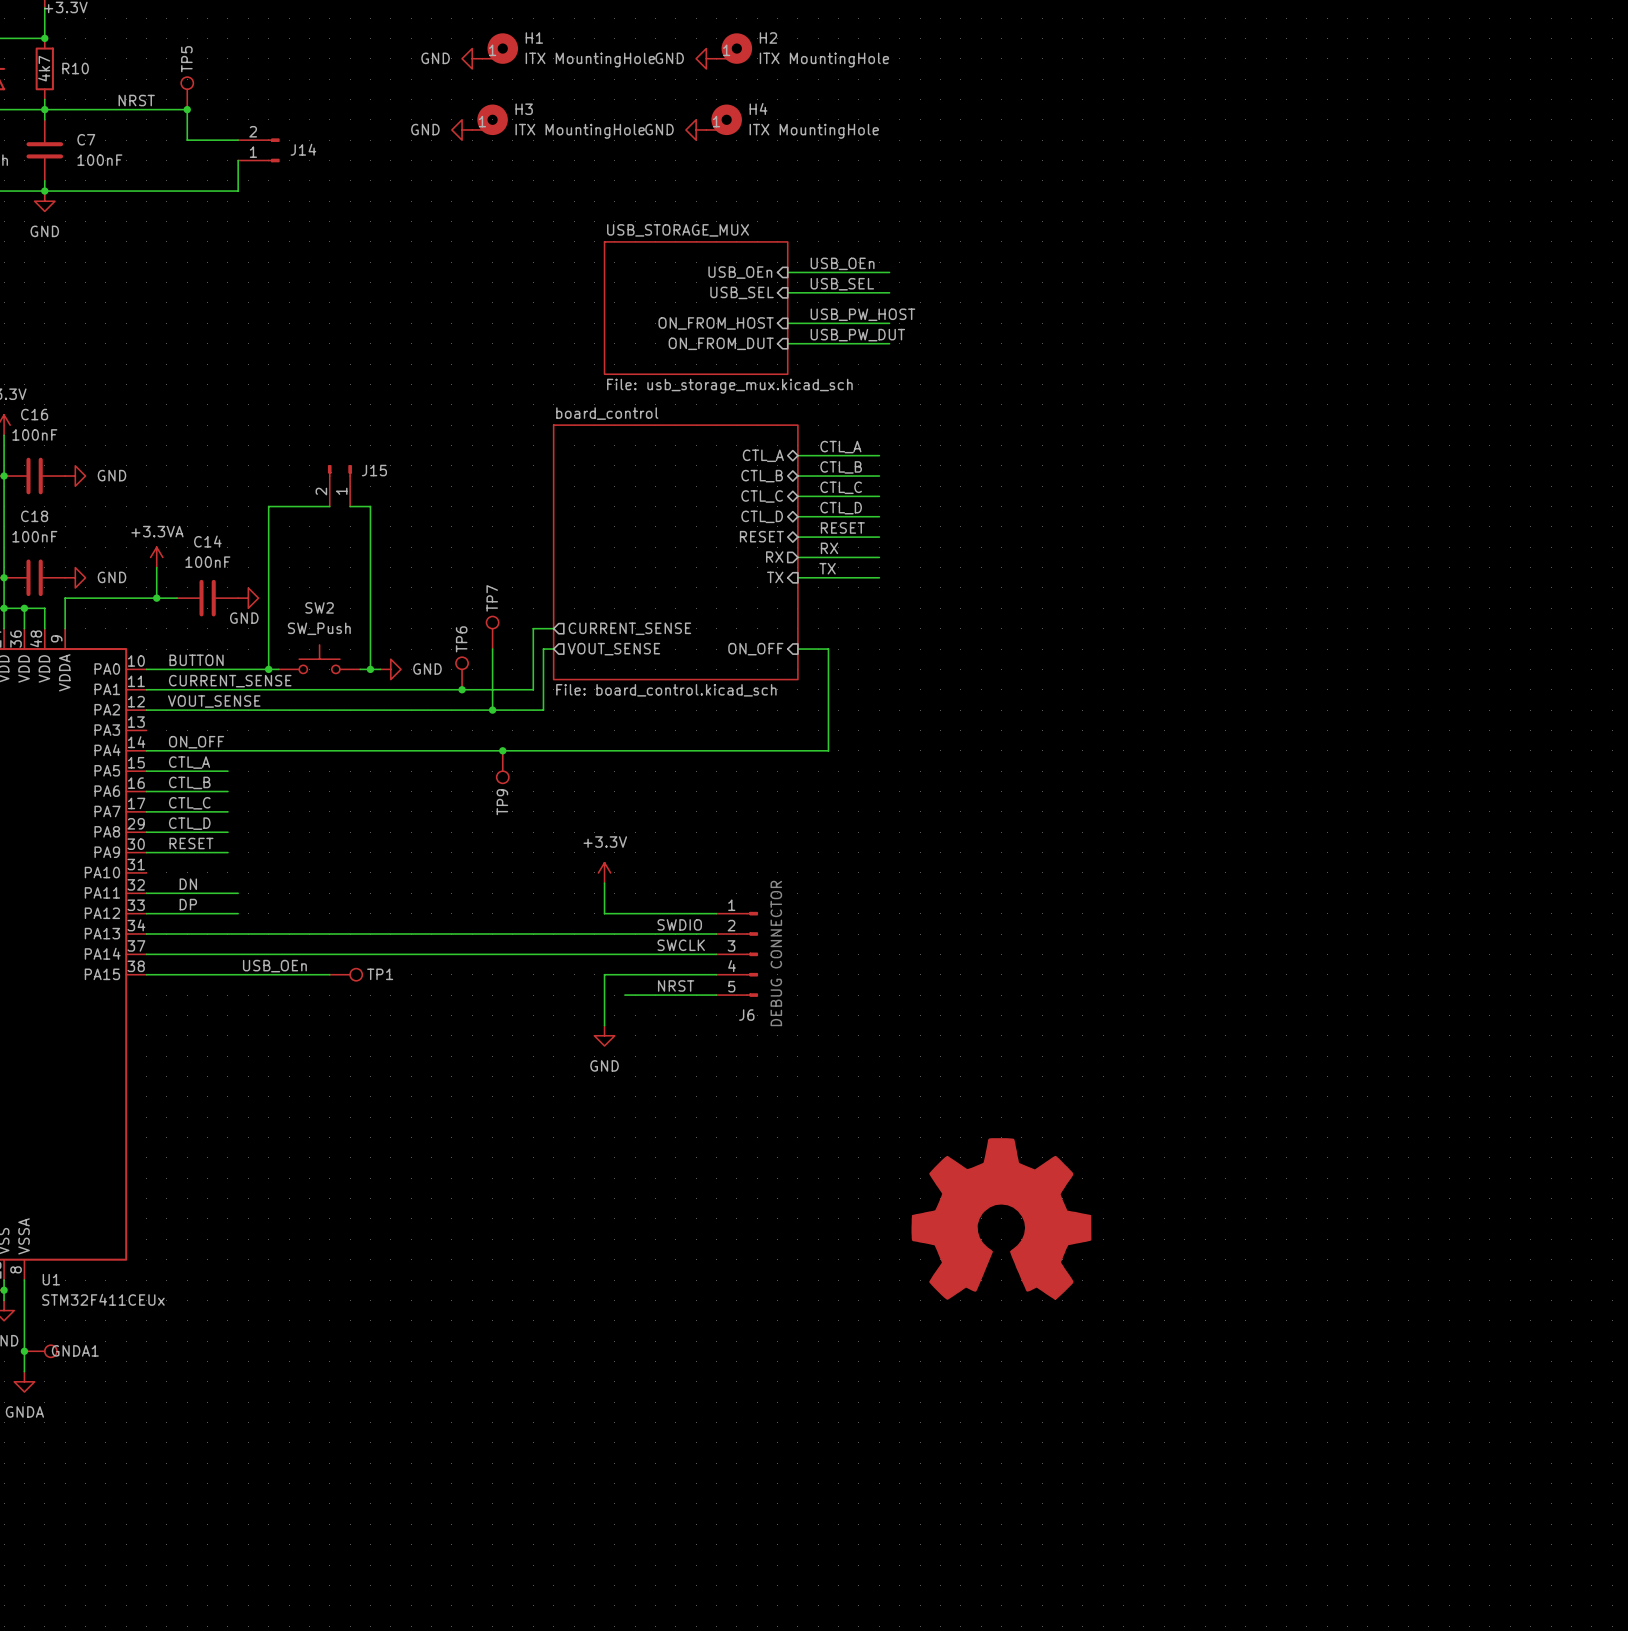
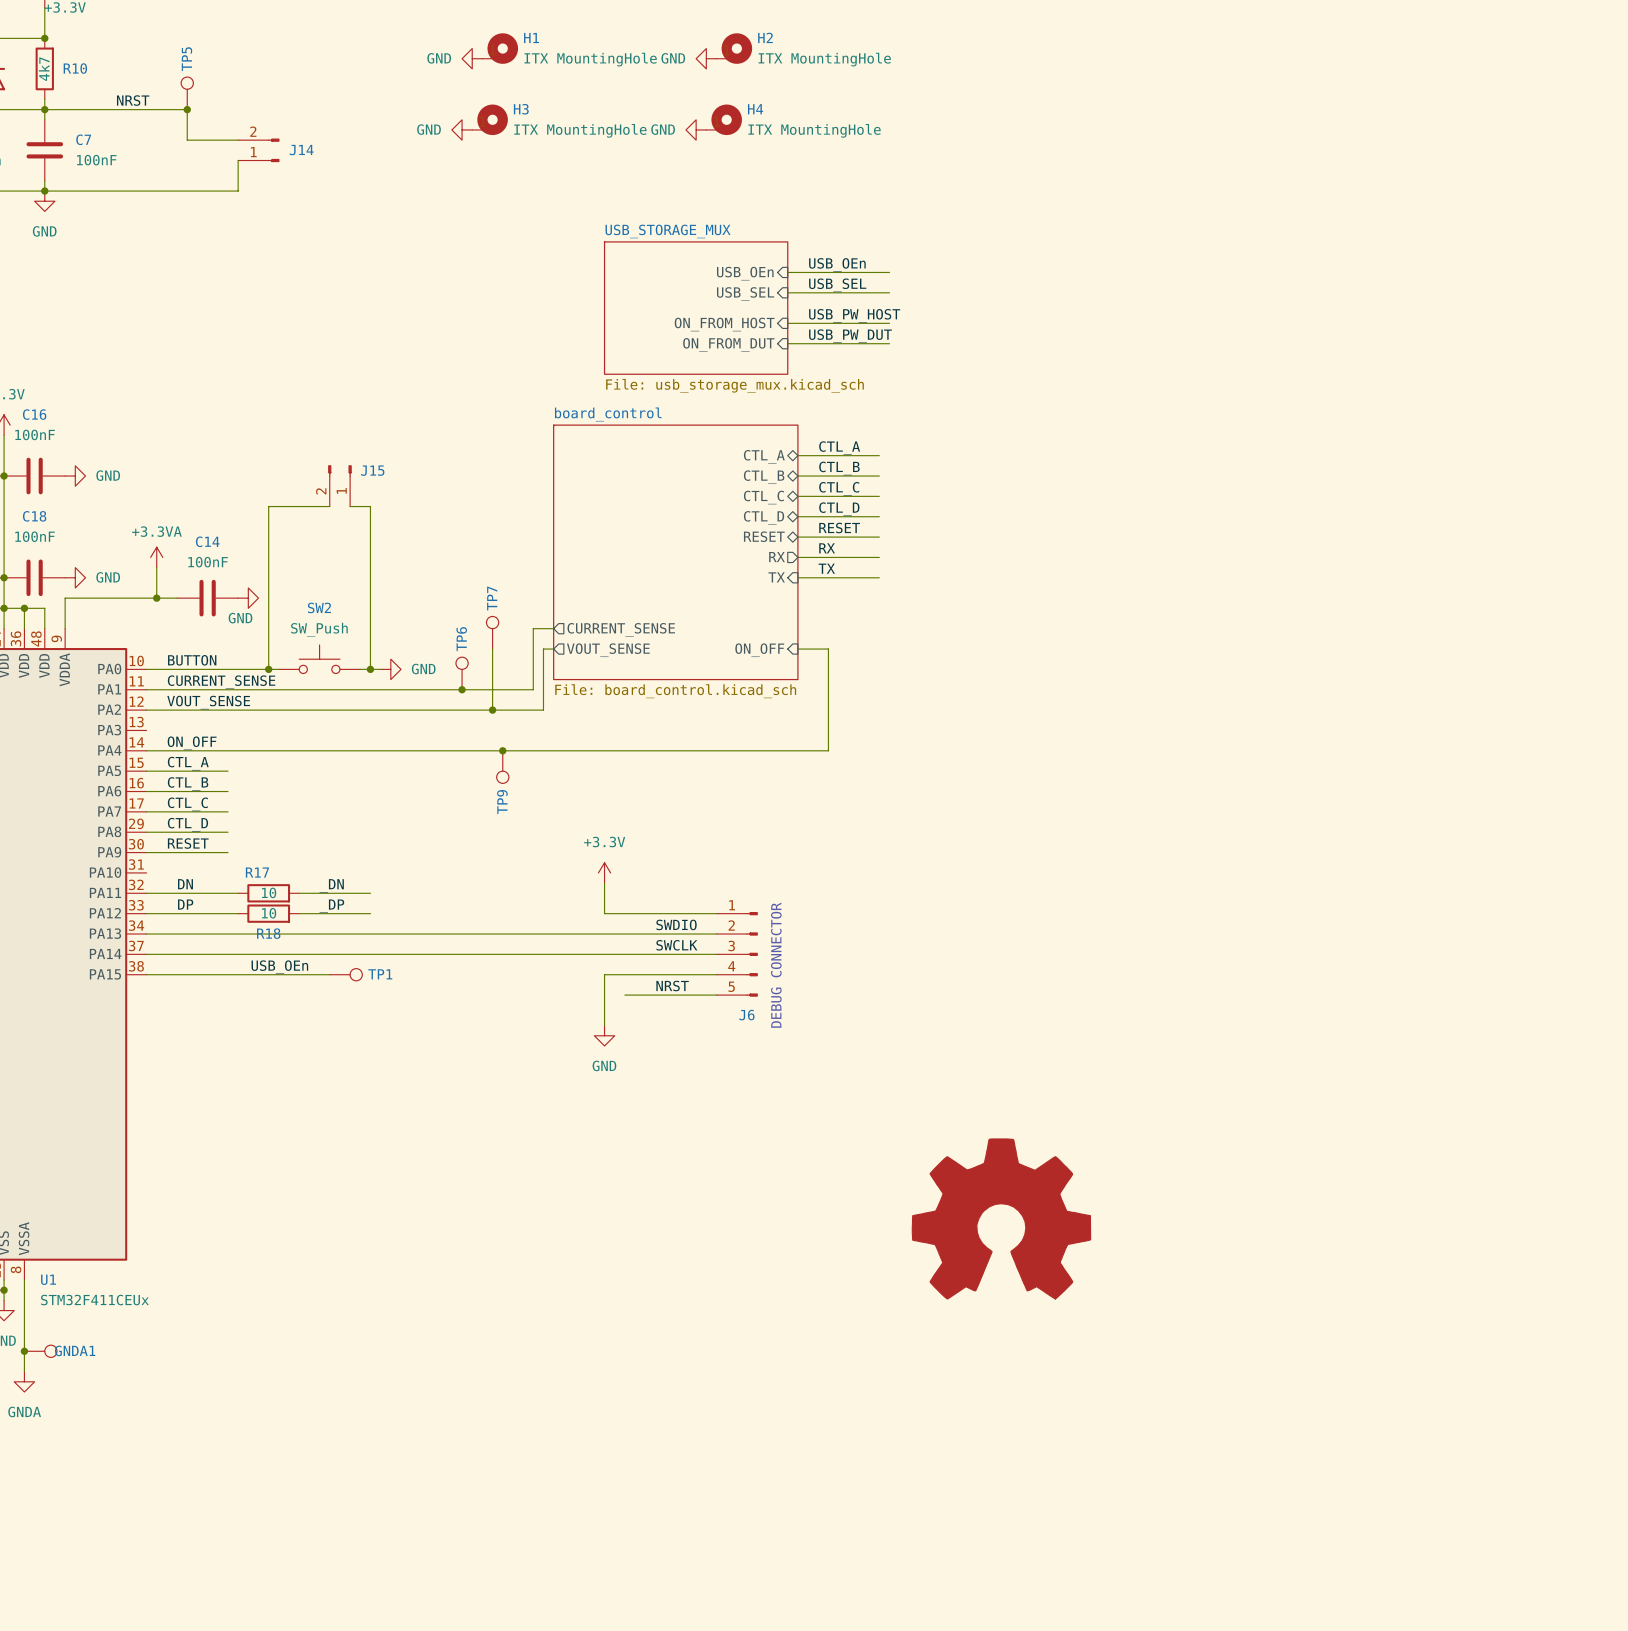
label: none -> _DN (331, 885)
R17: none -> 10 (268, 893)
wire: none -> (299, 893) (370, 893)
label: none -> _DP (331, 906)
R18: none -> 10 (268, 913)
wire: none -> (299, 913) (370, 913)

